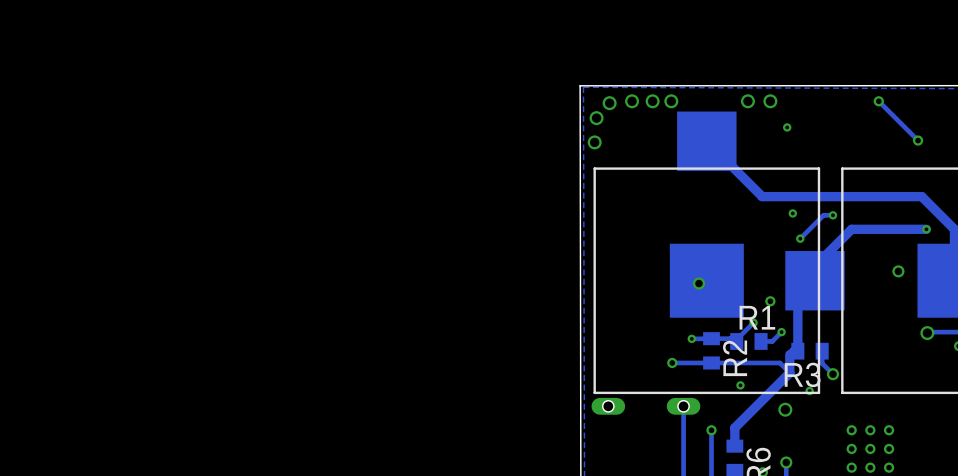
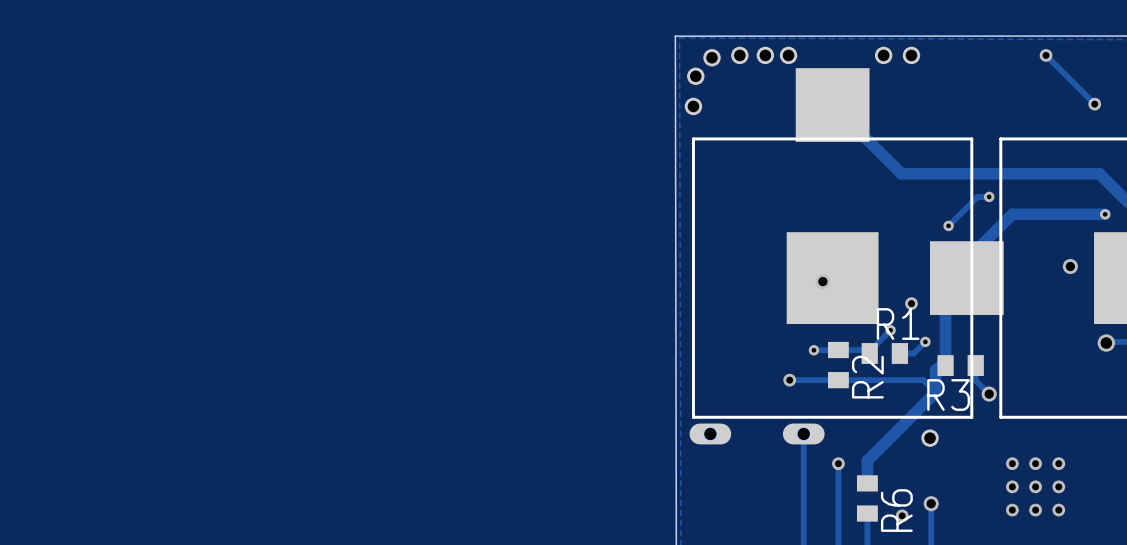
via: (787, 127) -> none
via: (792, 213) -> none
via: (740, 385) -> none
via: (809, 391) -> none

